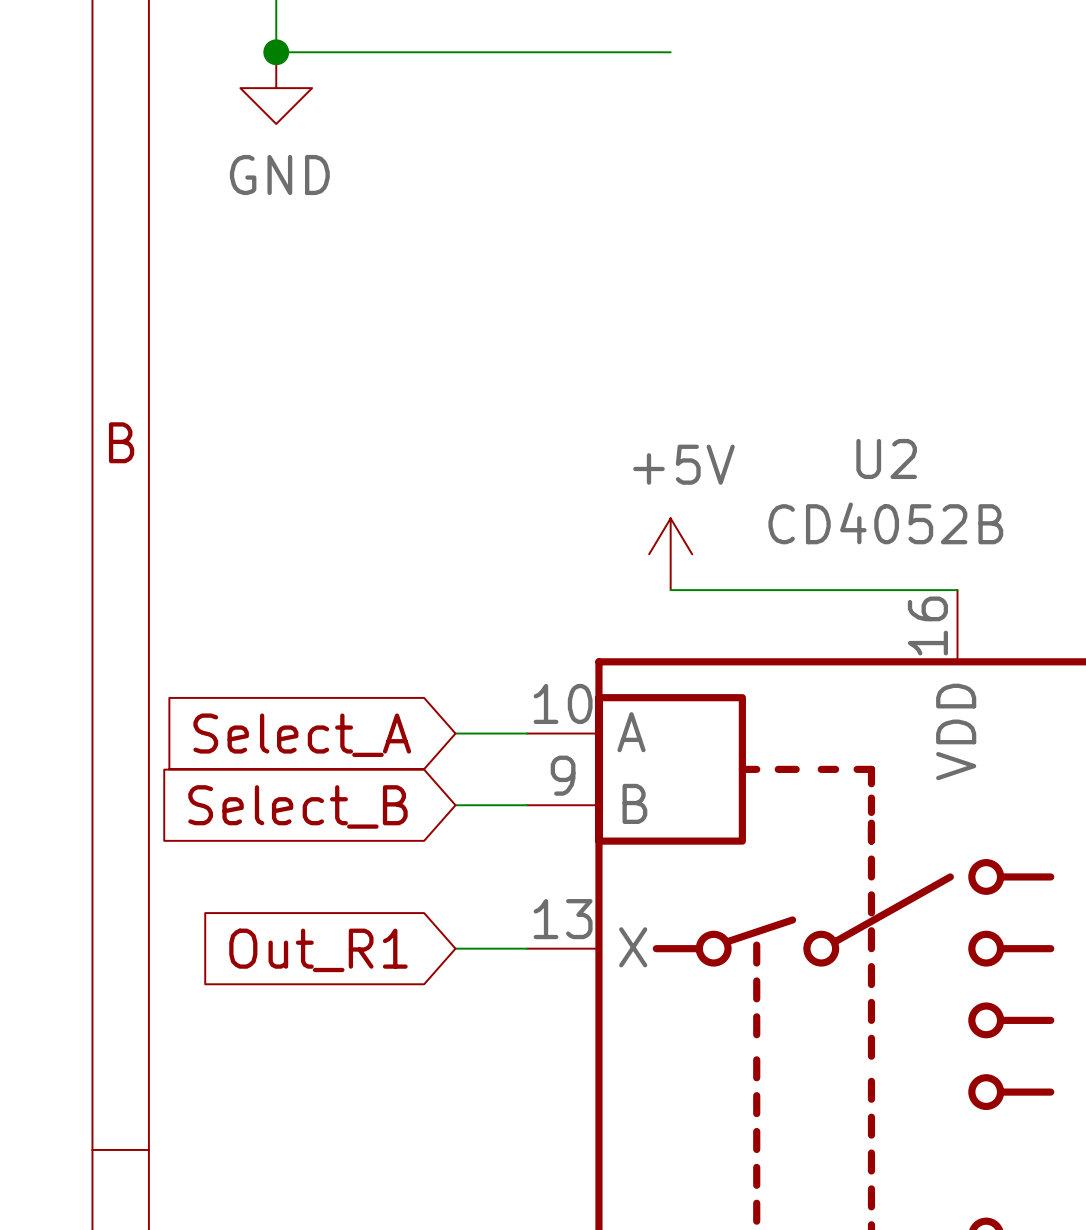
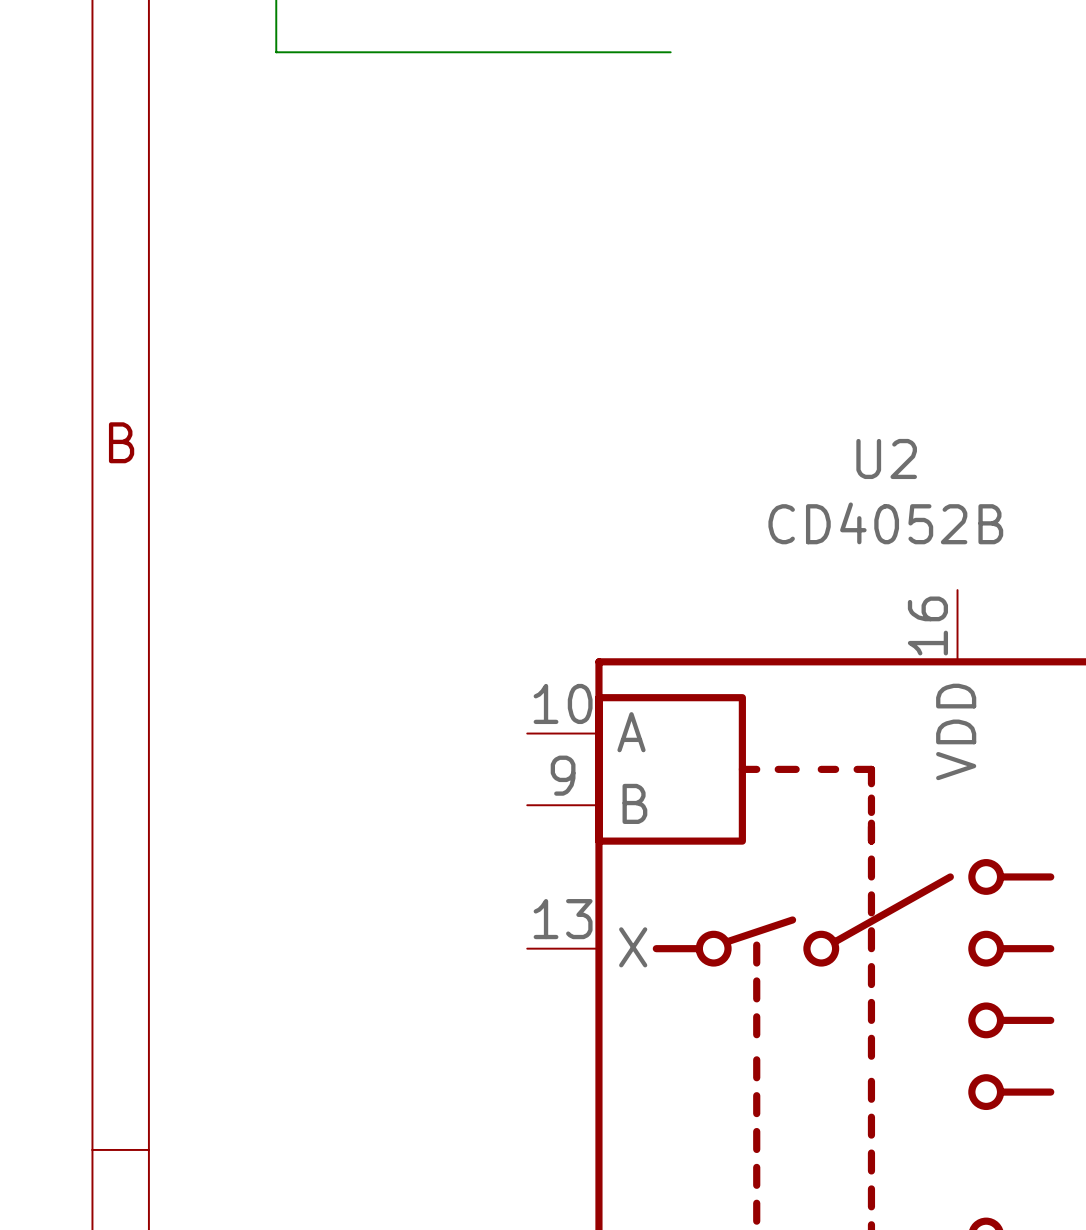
junction: (276, 52) -> none
power symbol: GND (276, 88) -> none
power symbol: +5V (670, 554) -> none
wire: (670, 590) (957, 590) -> none
wire: (455, 733) (527, 733) -> none
global label: Select_A (302, 735) -> none
wire: (455, 805) (527, 805) -> none
global label: Select_B (297, 806) -> none
wire: (455, 948) (527, 948) -> none
global label: Out_R1 (318, 950) -> none

